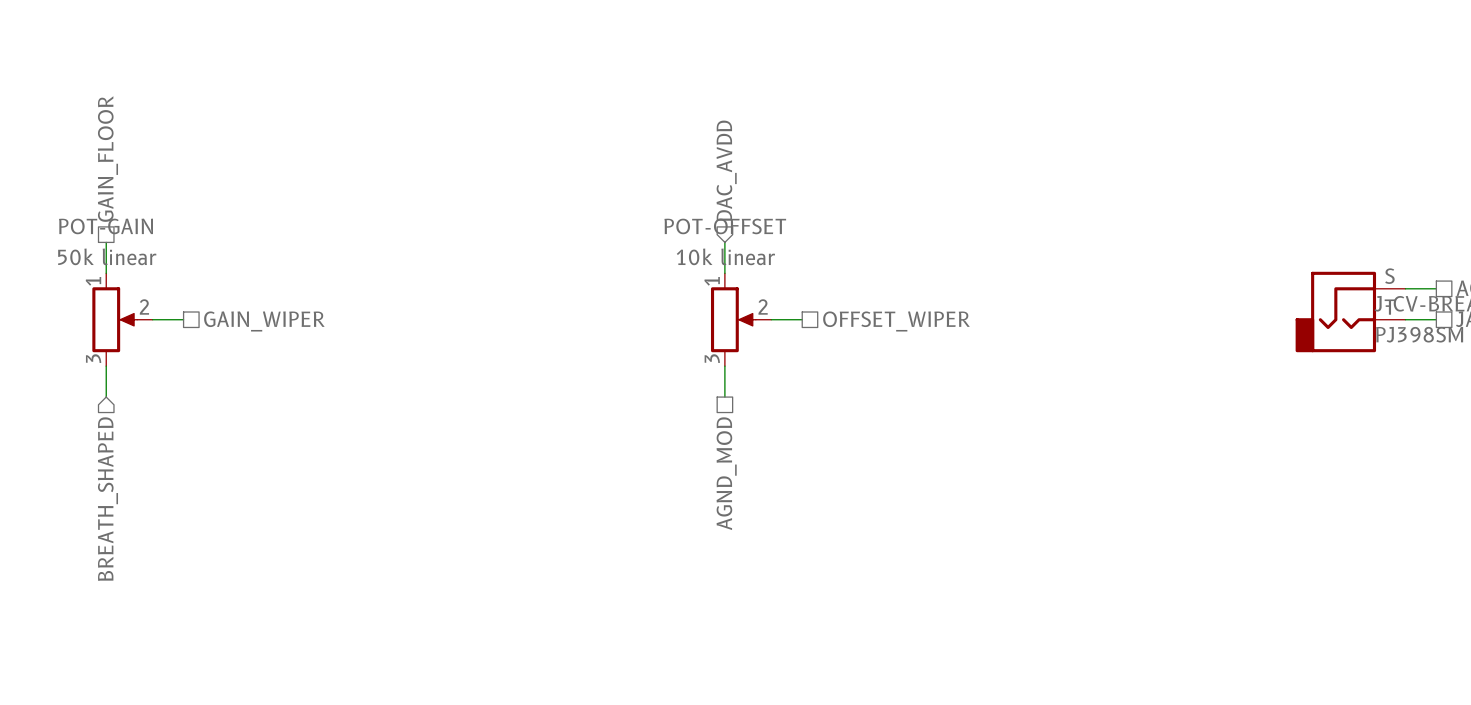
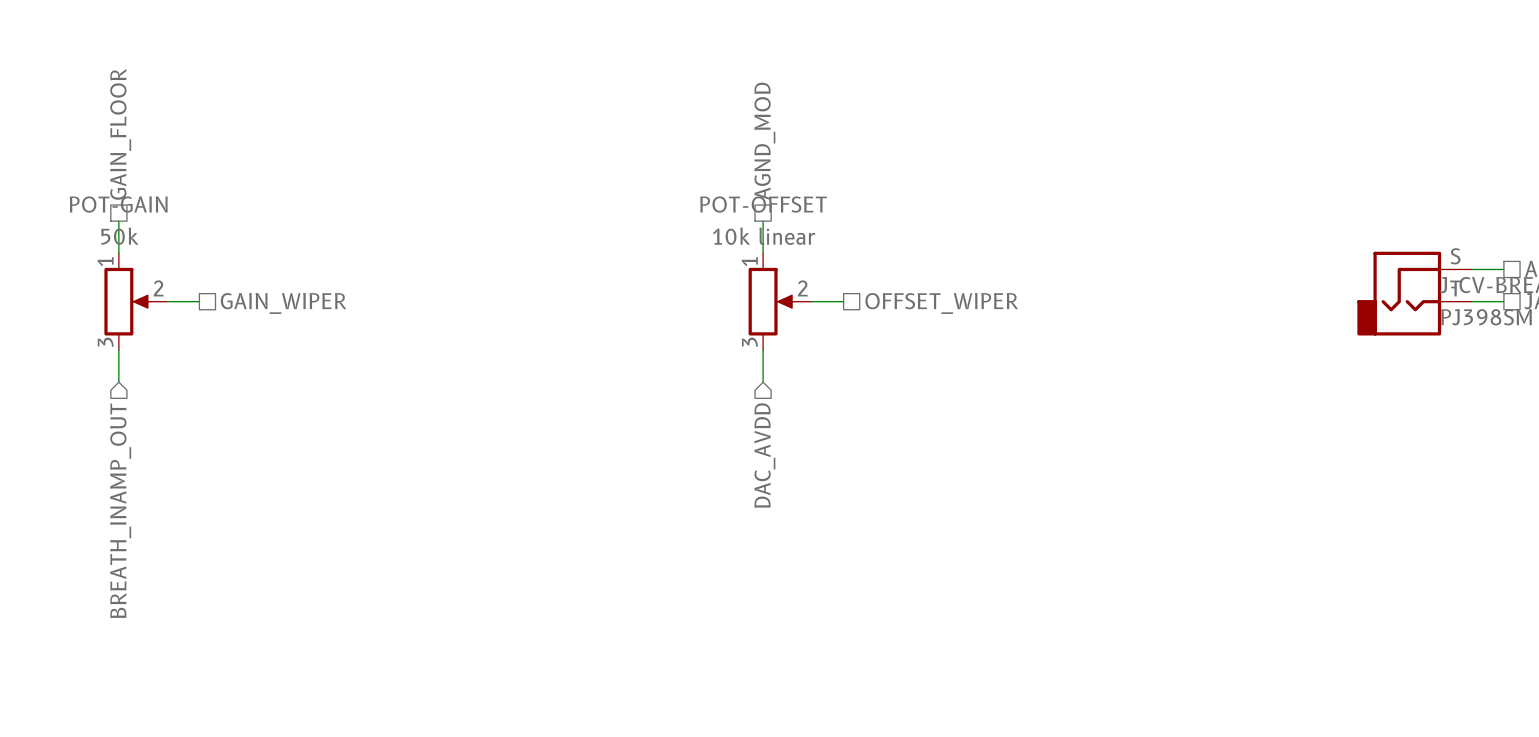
hierarchical label shape: input (726, 170) -> passive (764, 141)
hierarchical label: DAC_AVDD (726, 170) -> AGND_MOD (764, 141)
POT-GAIN value: 50k linear (107, 256) -> 50k (119, 236)
hierarchical label shape: passive (726, 473) -> input (764, 455)
hierarchical label: AGND_MOD (726, 473) -> DAC_AVDD (764, 455)
hierarchical label: BREATH_SHAPED (107, 499) -> BREATH_INAMP_OUT (120, 510)

